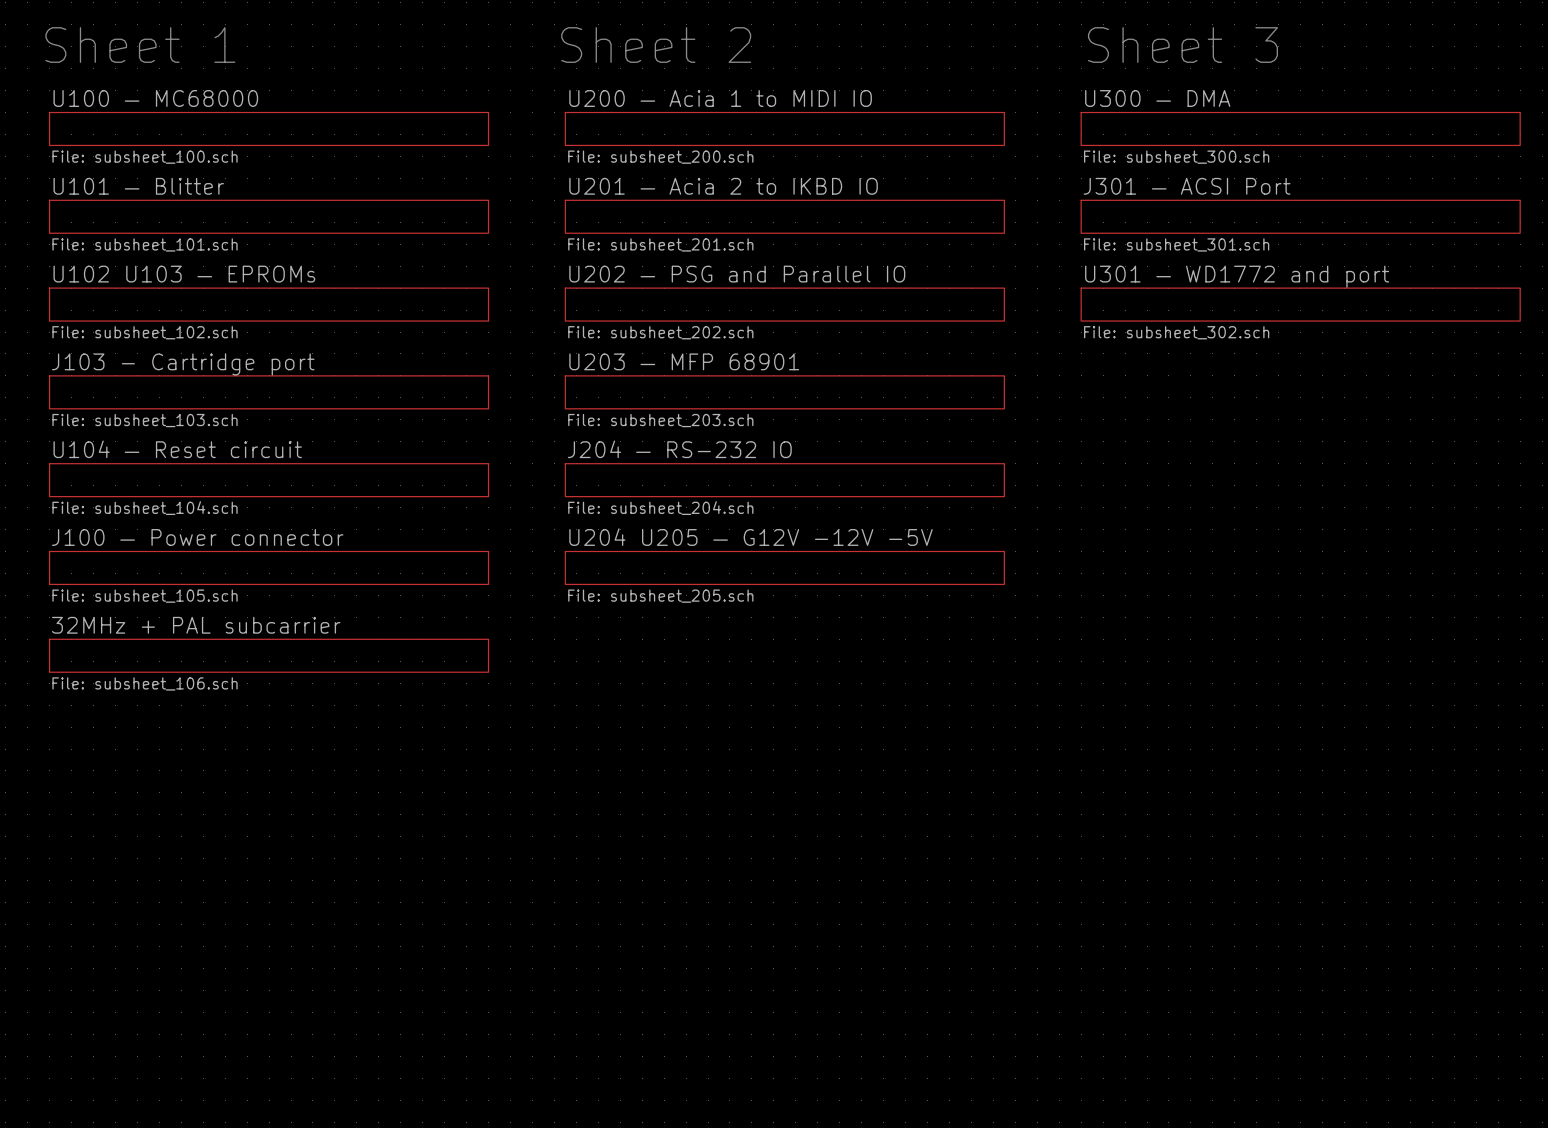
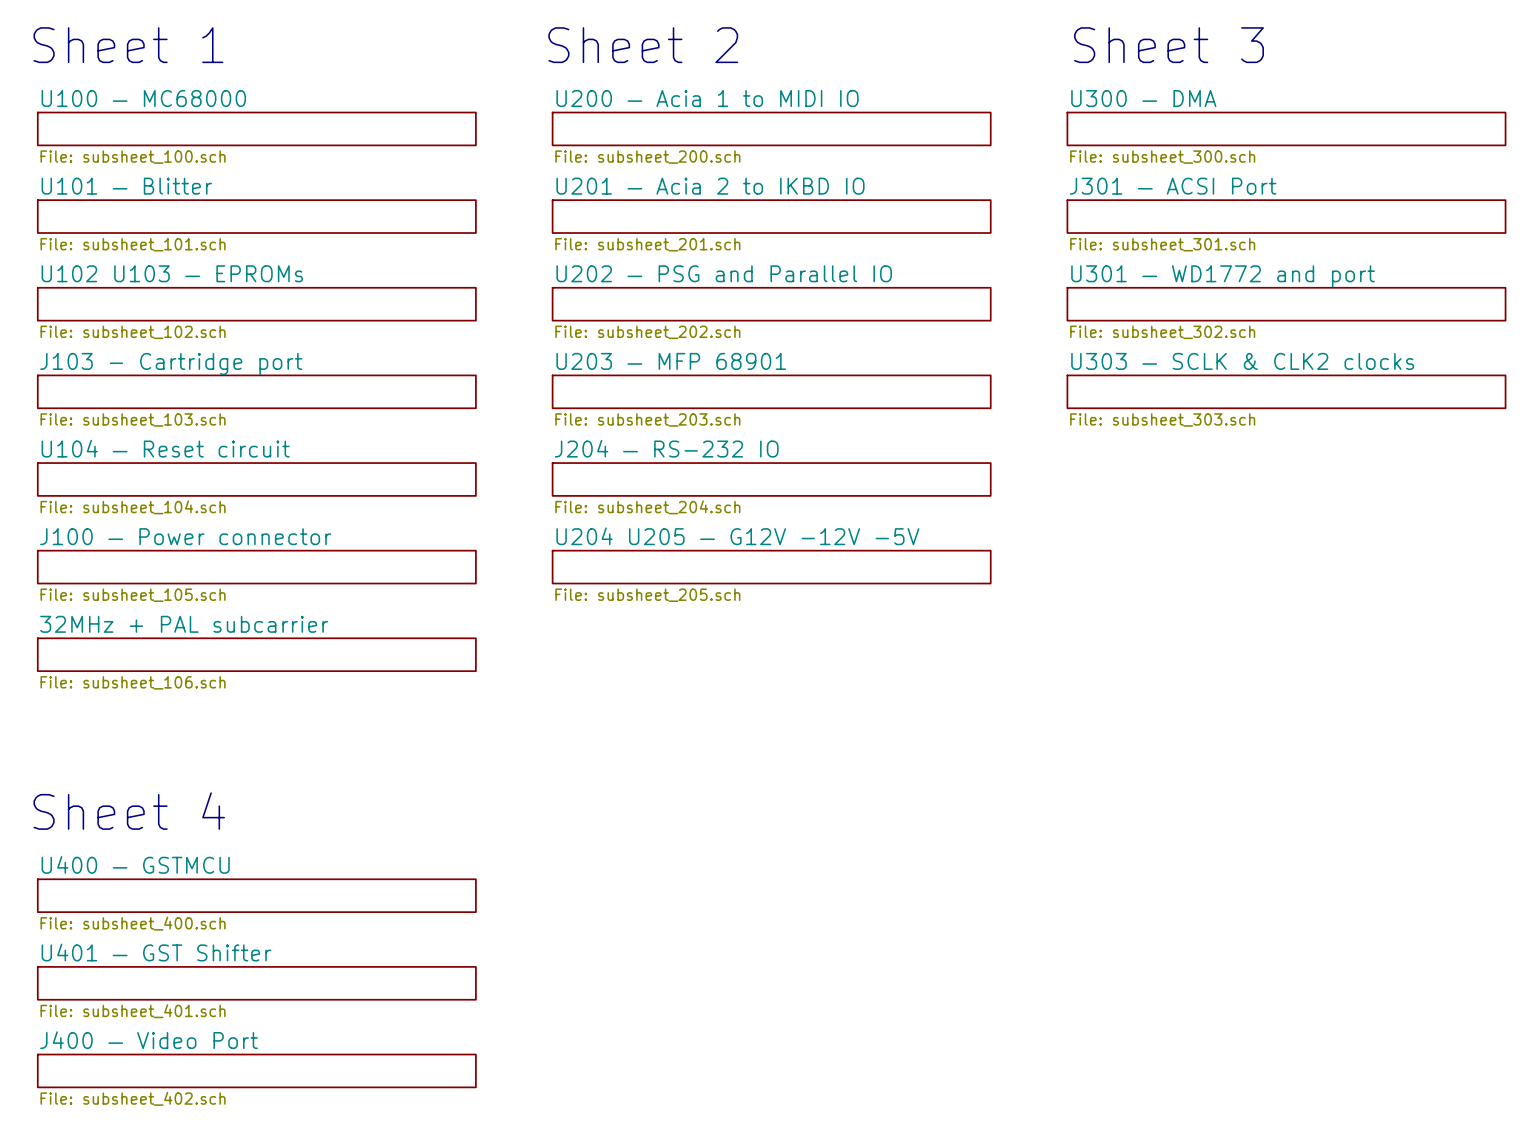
sheet U303 — SCLK & CLK2 clocks: none -> File: subsheet_303.sch (1286, 391)
text: none -> Sheet 4 (129, 811)
sheet U400 — GSTMCU: none -> File: subsheet_400.sch (256, 895)
sheet U401 — GST Shifter: none -> File: subsheet_401.sch (256, 983)
sheet J400 — Video Port: none -> File: subsheet_402.sch (256, 1070)

